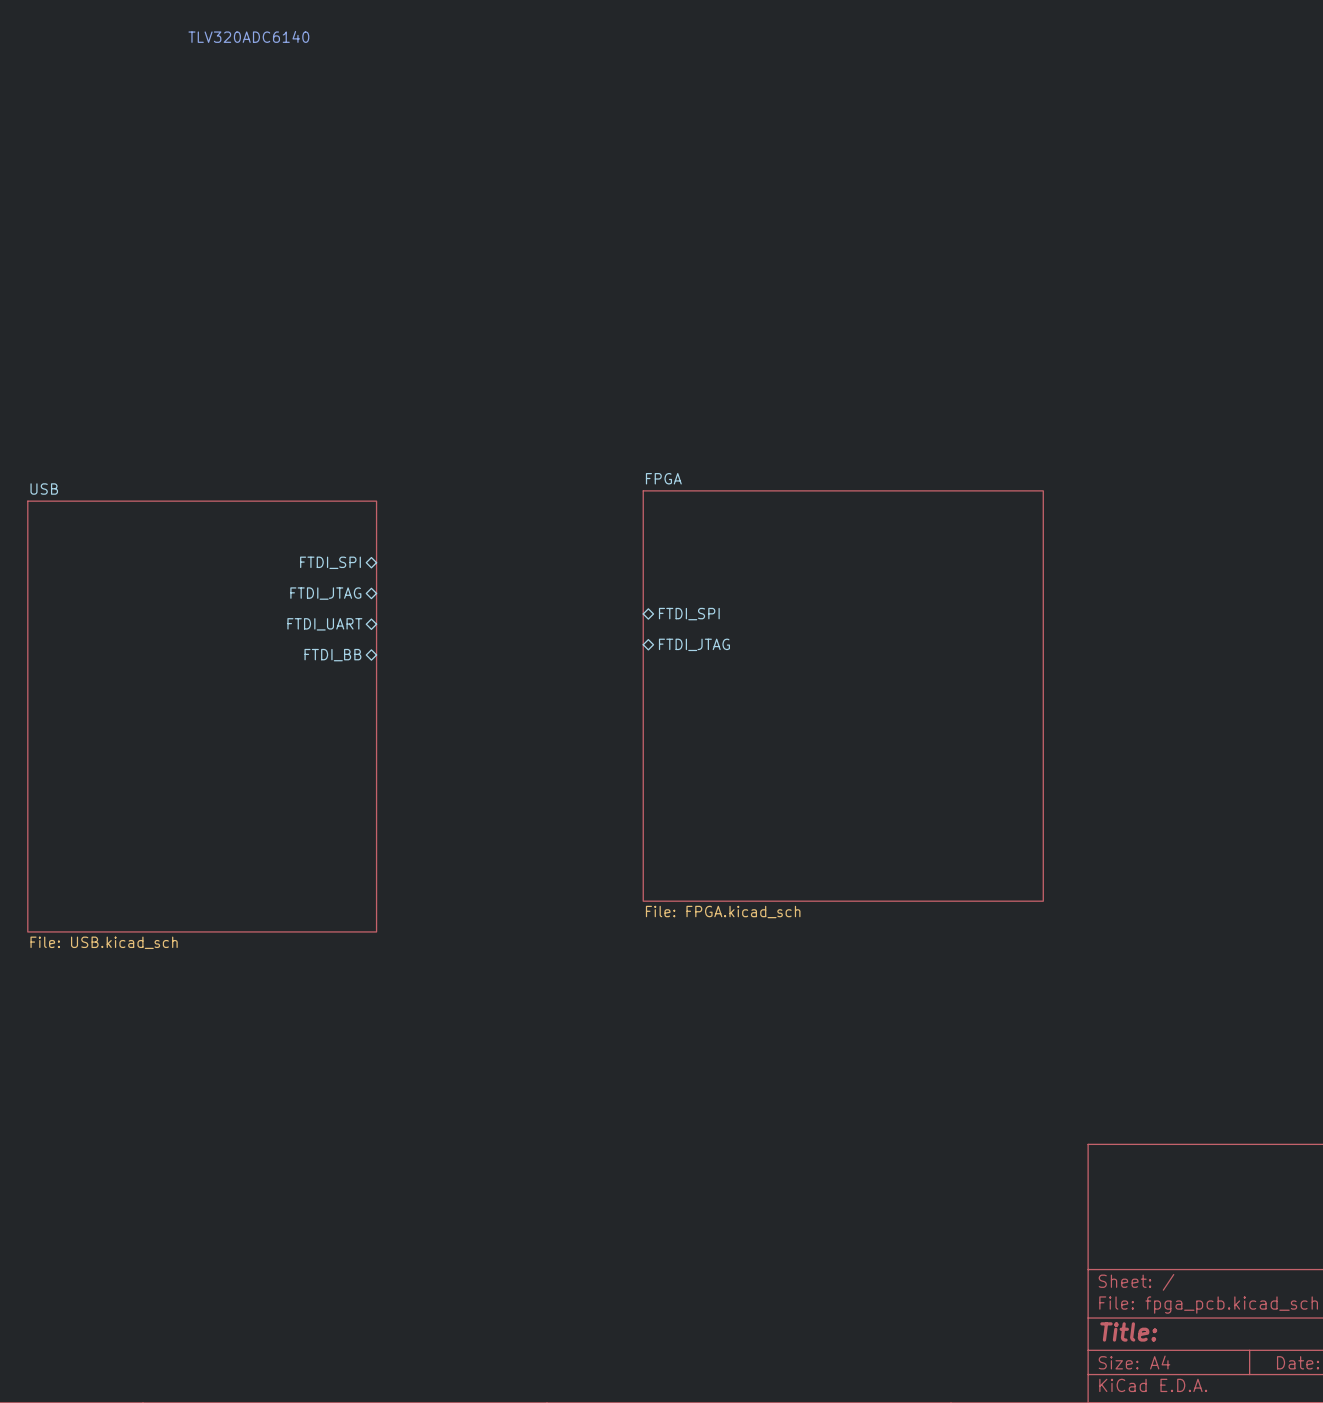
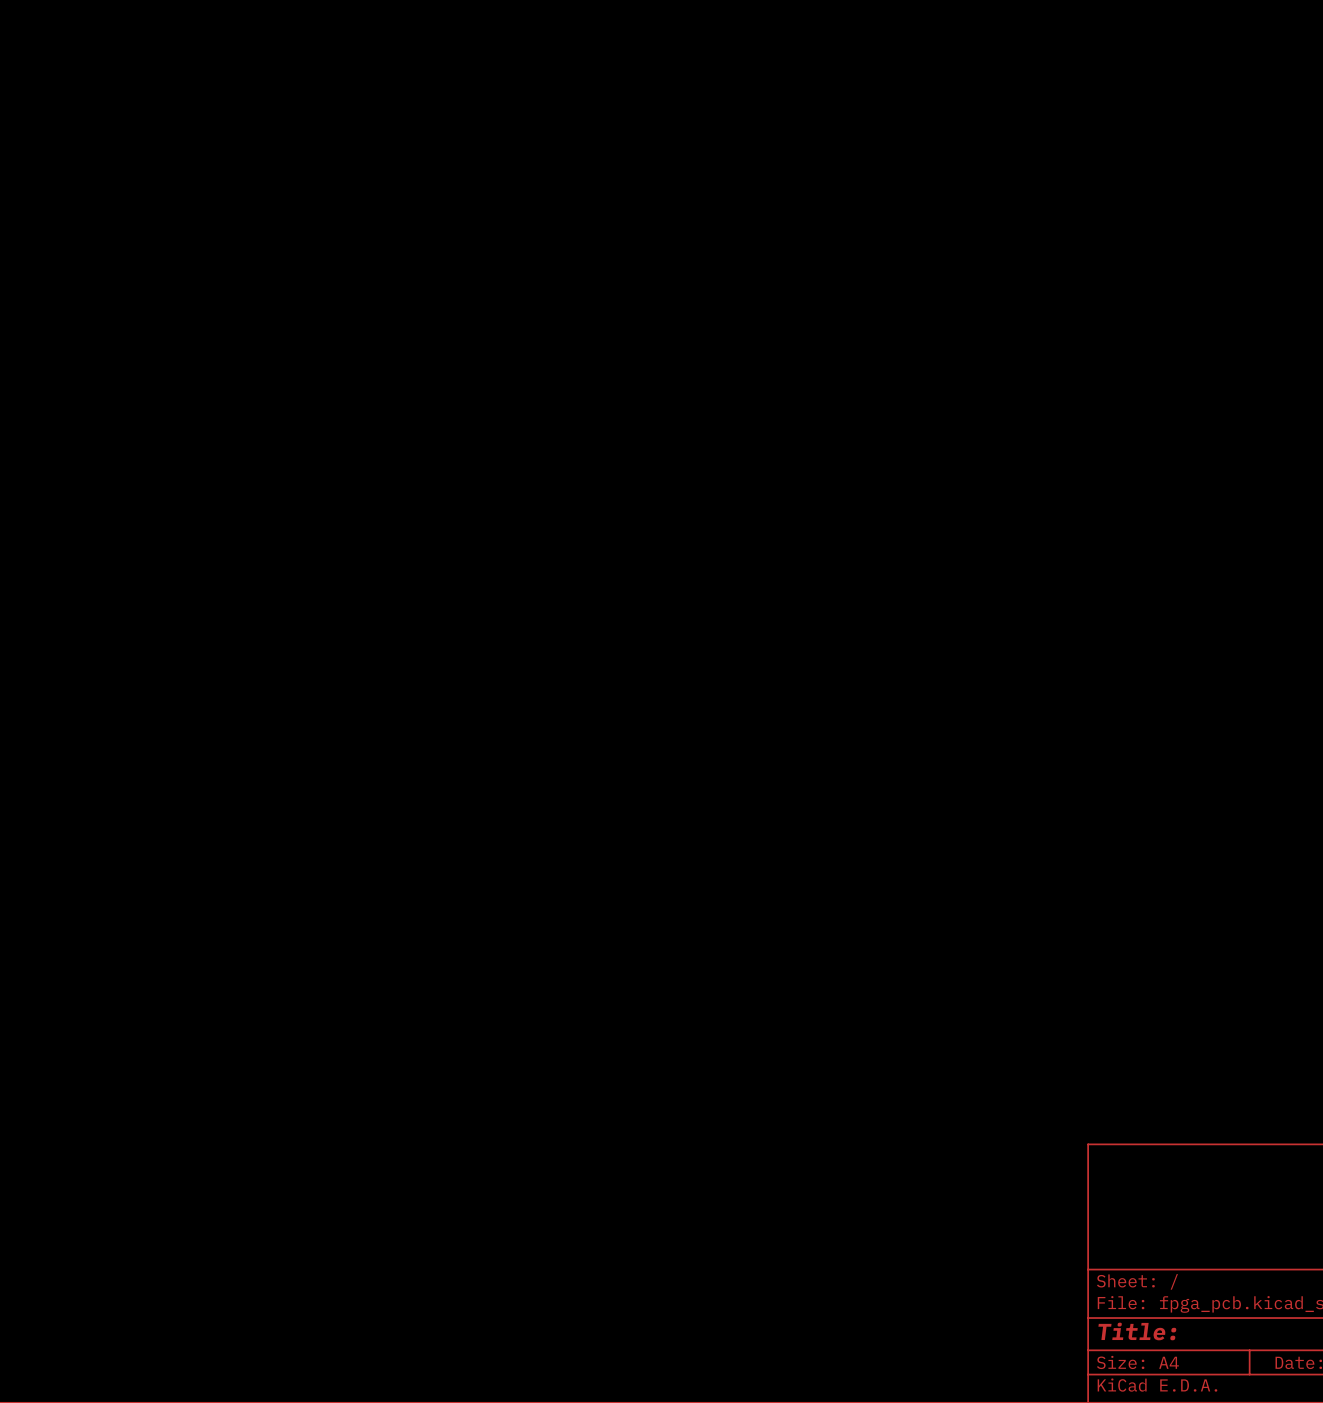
text: TLV320ADC6140 (248, 36) -> none
sheet pin: FTDI_SPI (330, 562) -> none
sheet pin: FTDI_JTAG (325, 593) -> none
sheet pin: FTDI_SPI (689, 614) -> none
sheet pin: FTDI_UART (324, 624) -> none
sheet pin: FTDI_JTAG (694, 644) -> none
sheet pin: FTDI_BB (332, 655) -> none
sheet FPGA: File: FPGA.kicad_sch (843, 696) -> none
sheet USB: File: USB.kicad_sch (202, 716) -> none

